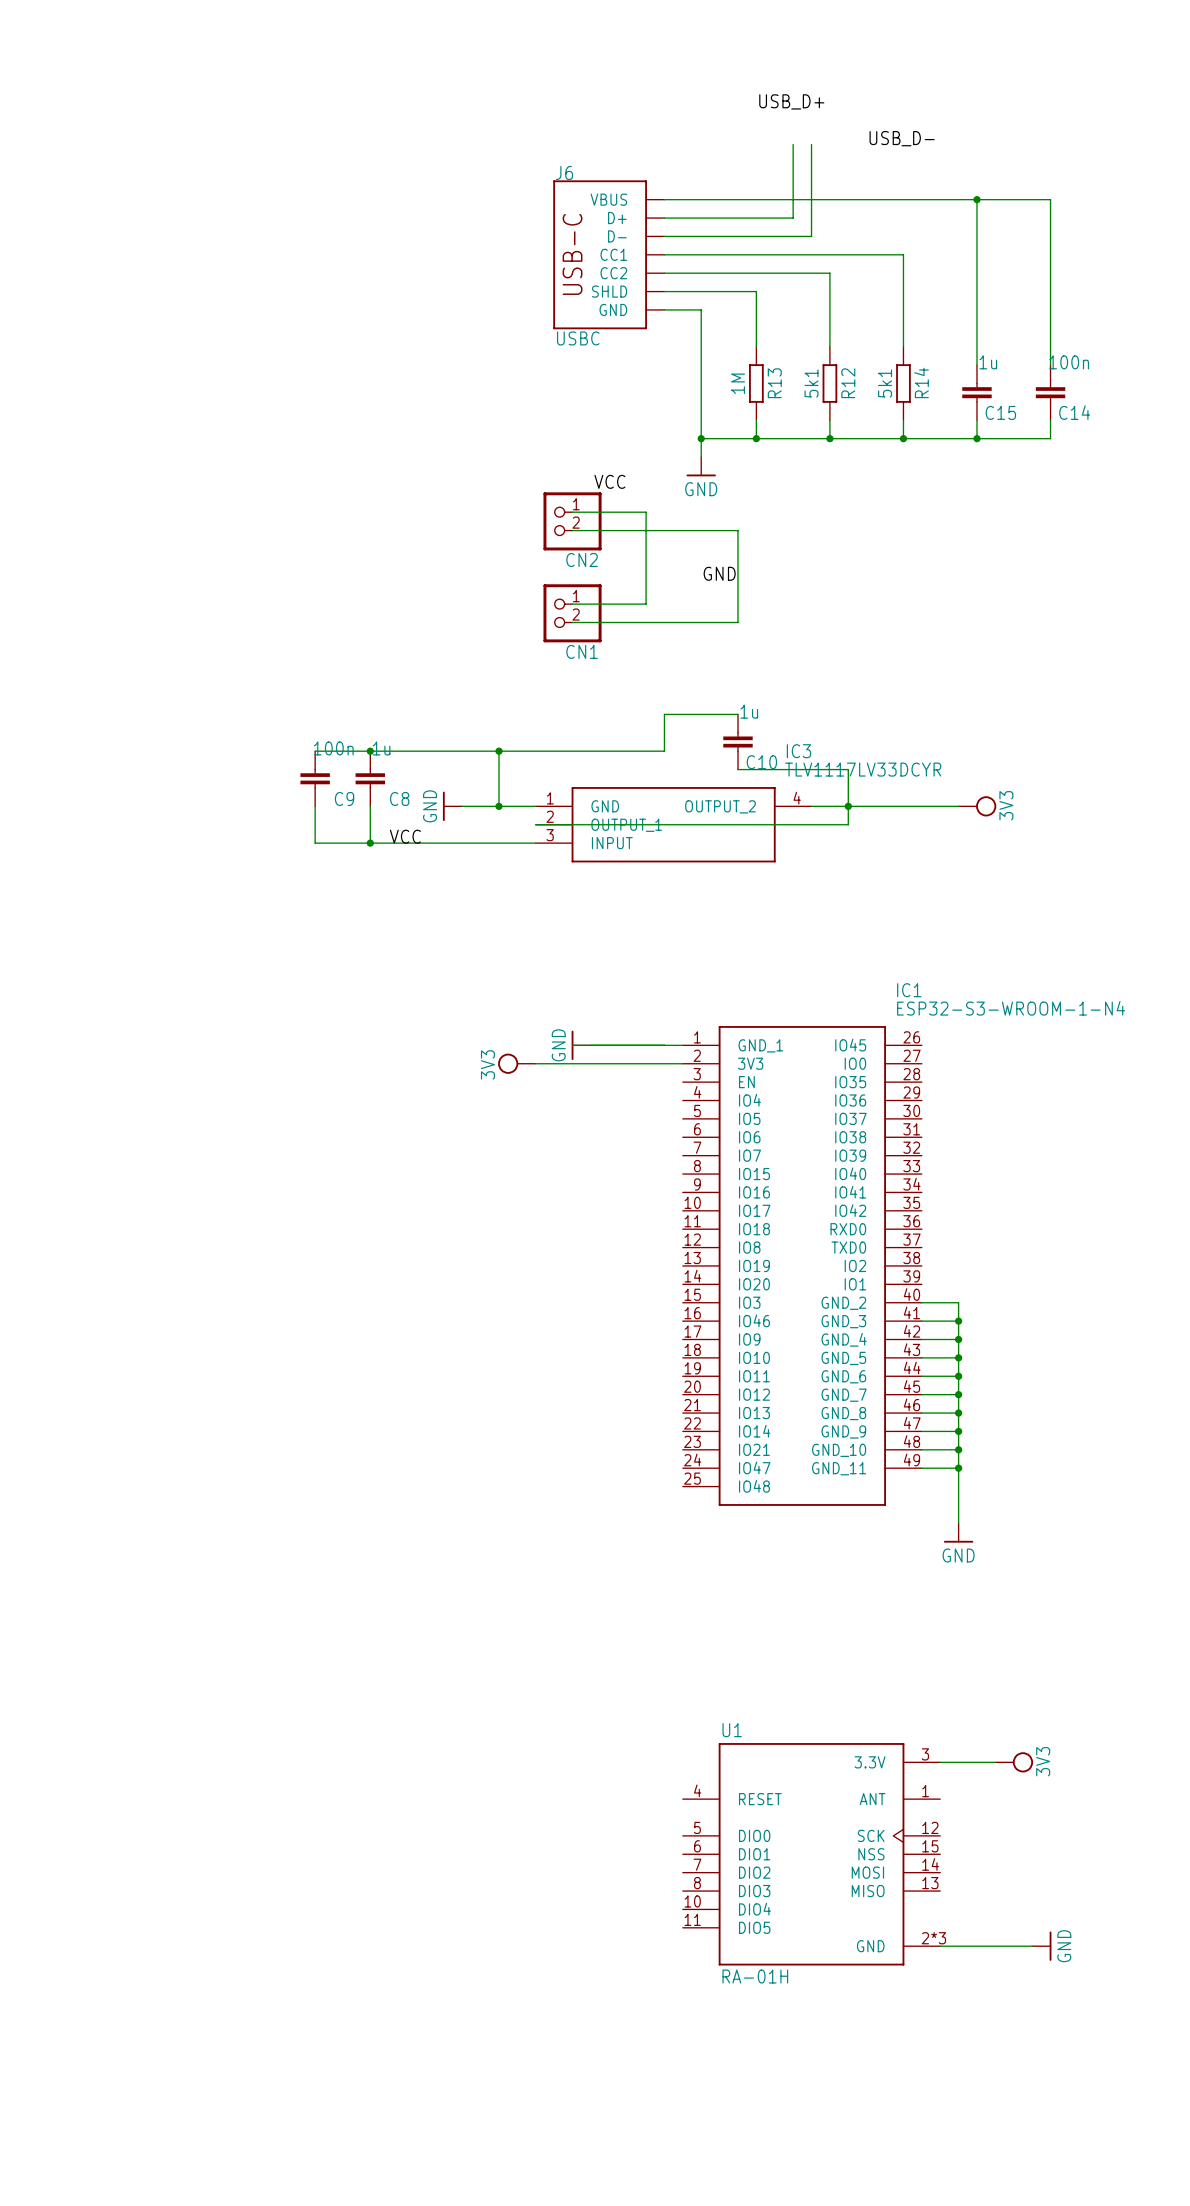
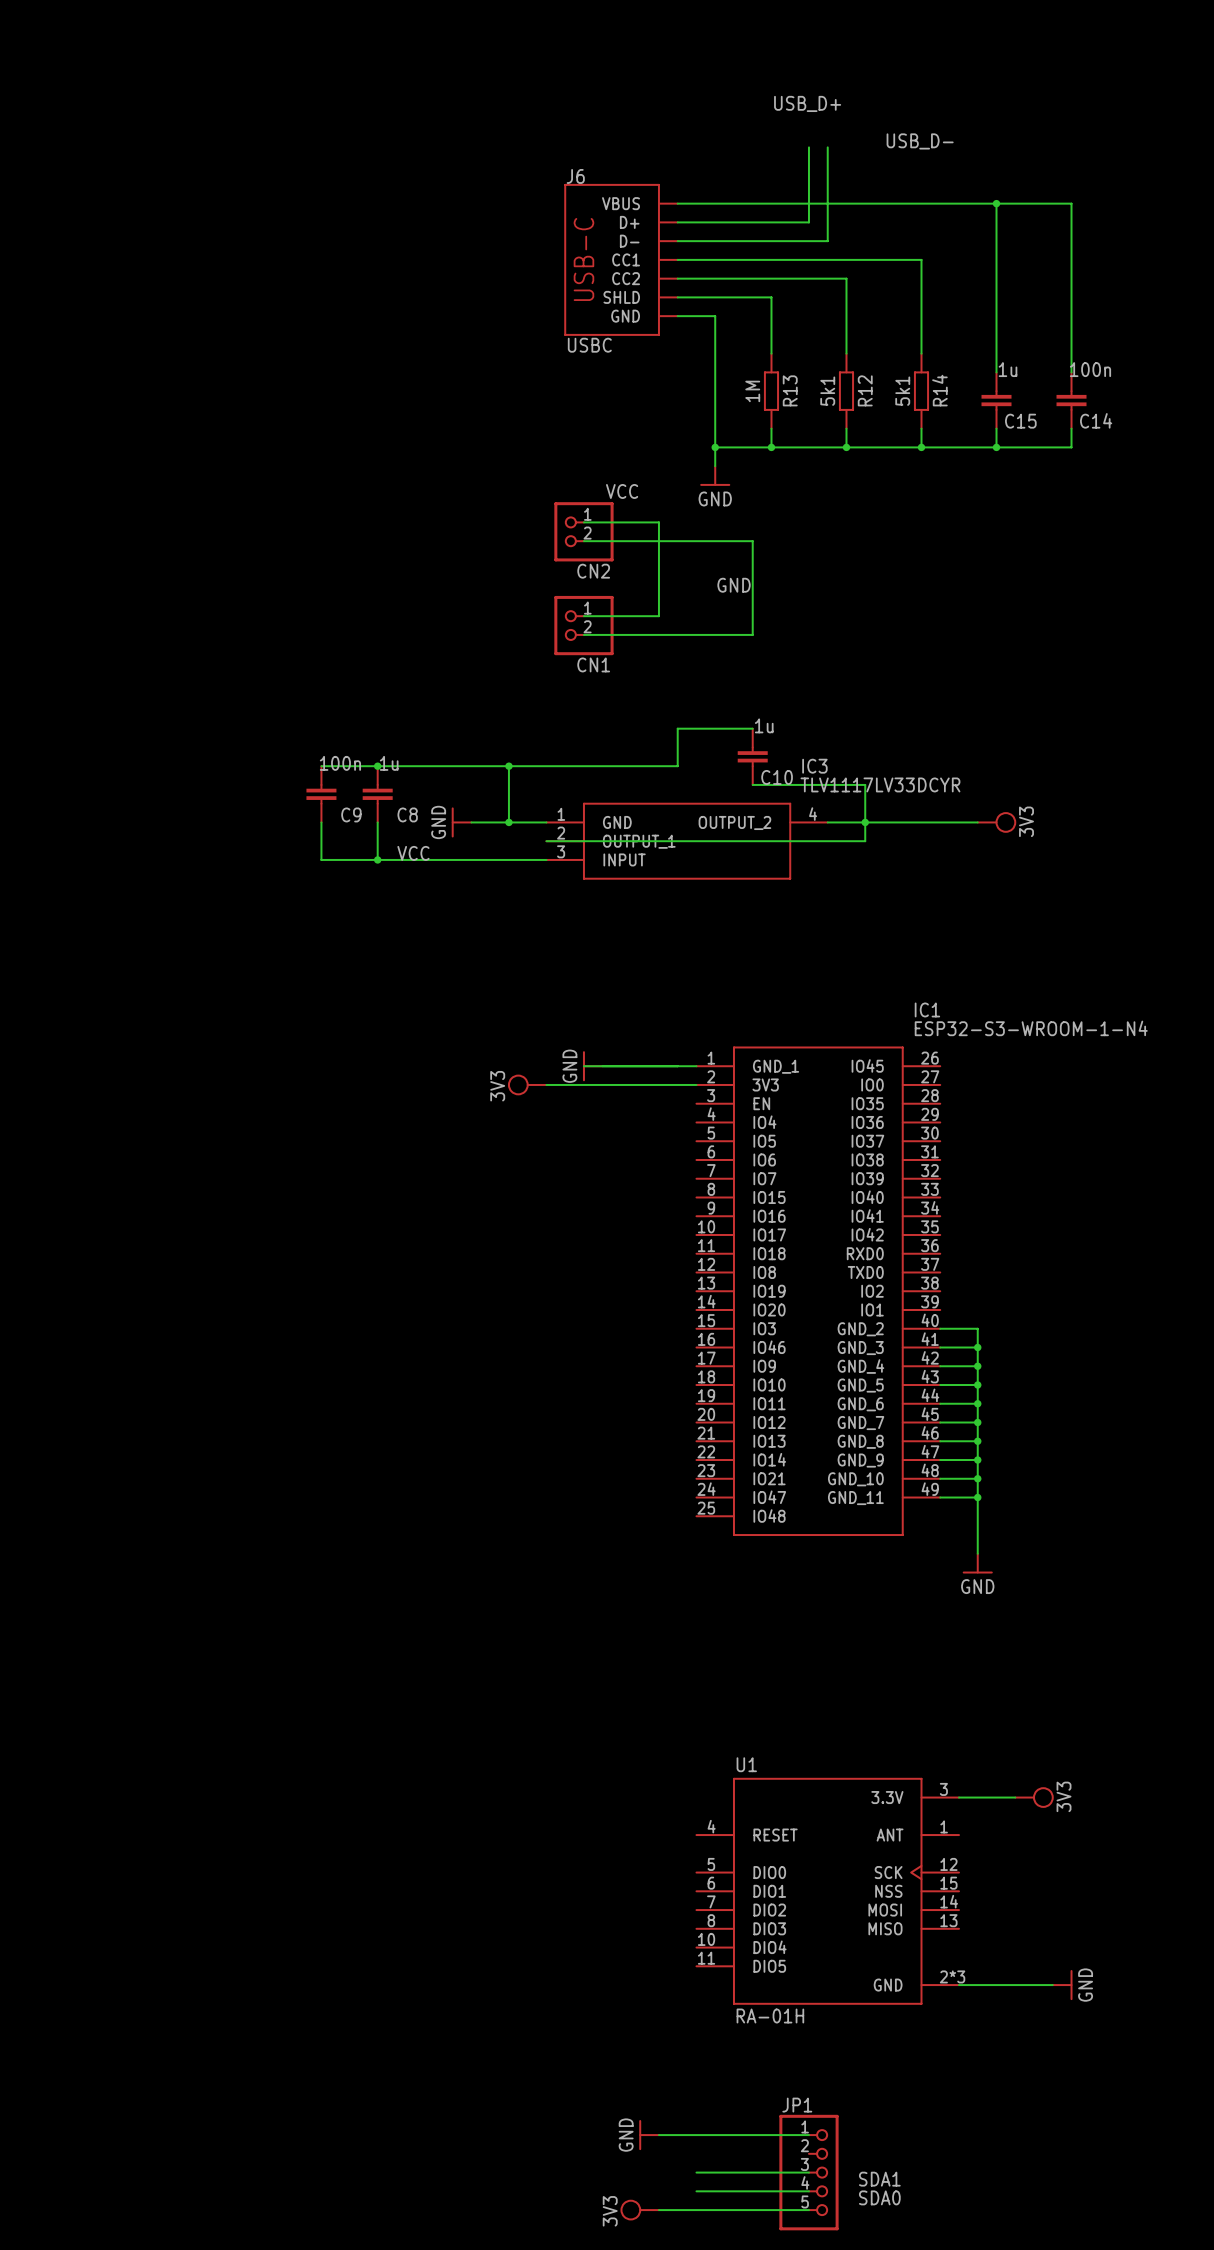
power symbol: none -> GND (649, 2135)
wire: none -> (658, 2135) (808, 2135)
wire: none -> (696, 2172) (808, 2172)
JP1: none -> (808, 2172)
label: none -> SDA1 (879, 2179)
wire: none -> (696, 2191) (808, 2191)
label: none -> SDA0 (879, 2197)
power symbol: none -> 3V3 (639, 2210)
wire: none -> (658, 2210) (808, 2210)

